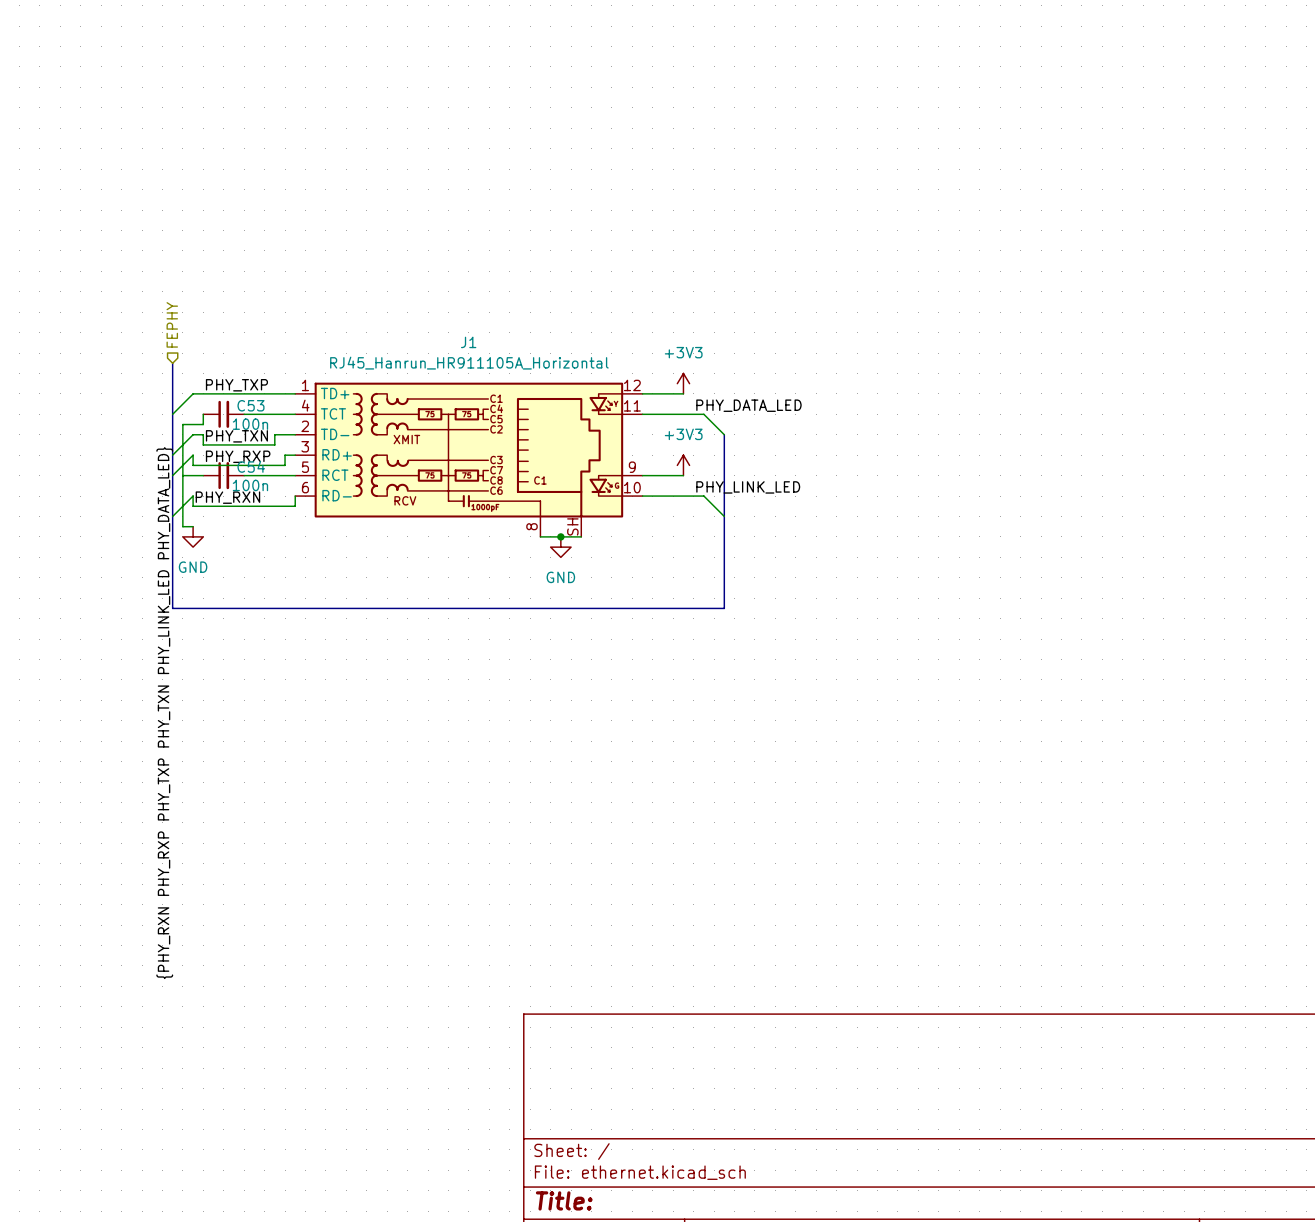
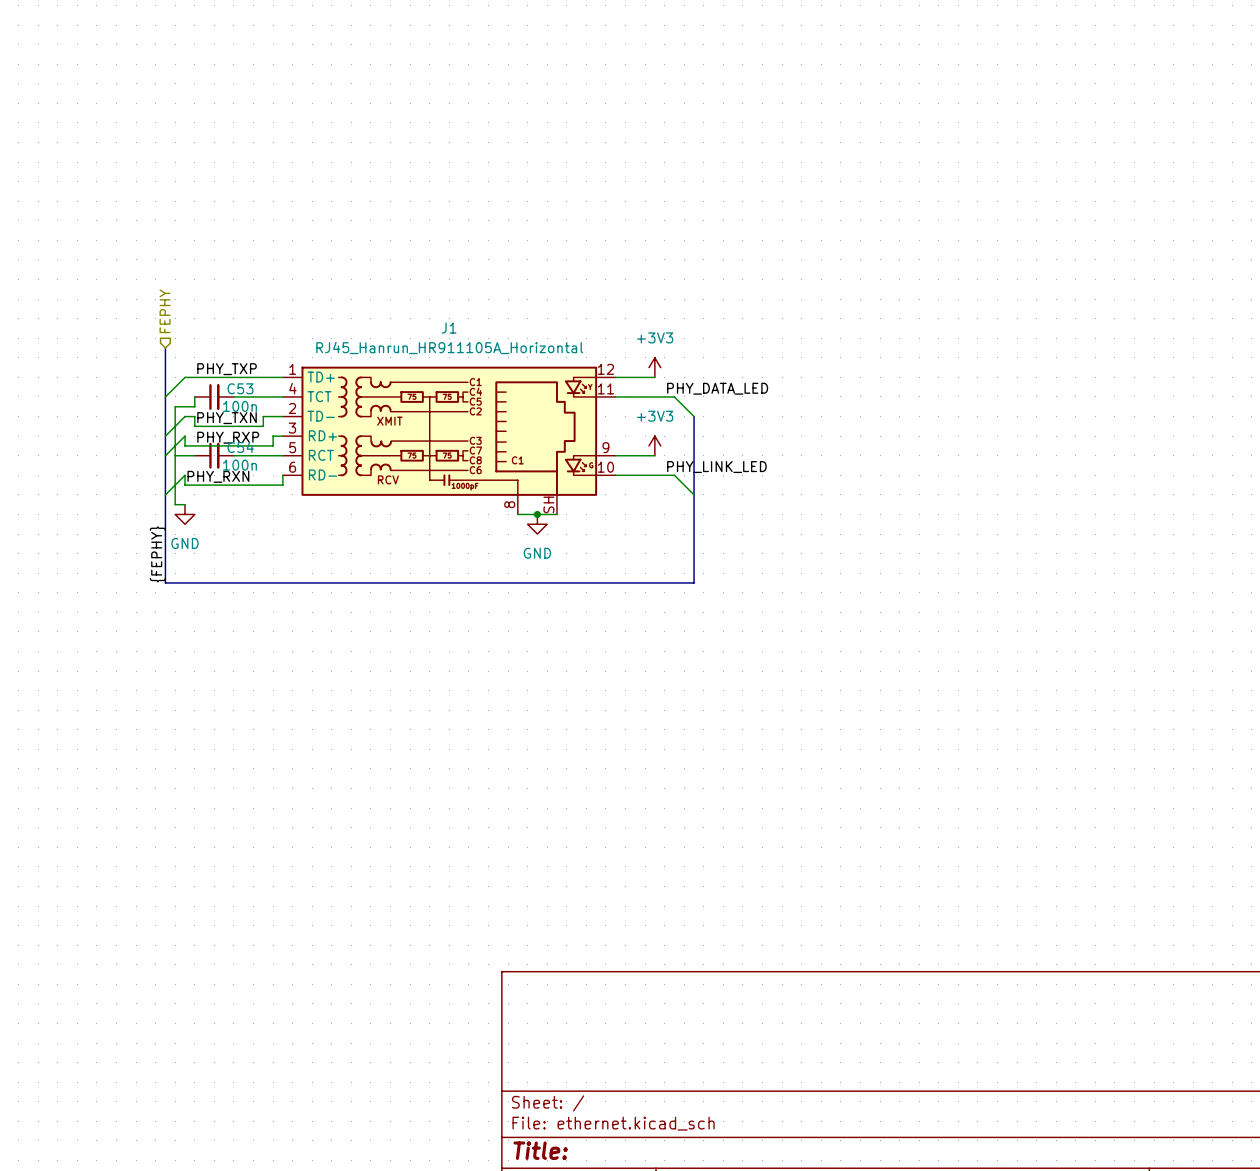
label: none -> {FEPHY} (157, 554)
label: {PHY_RXN PHY_RXP PHY_TXP PHY_TXN PHY_LINK_LED PHY_DATA_LED} (164, 713) -> none

